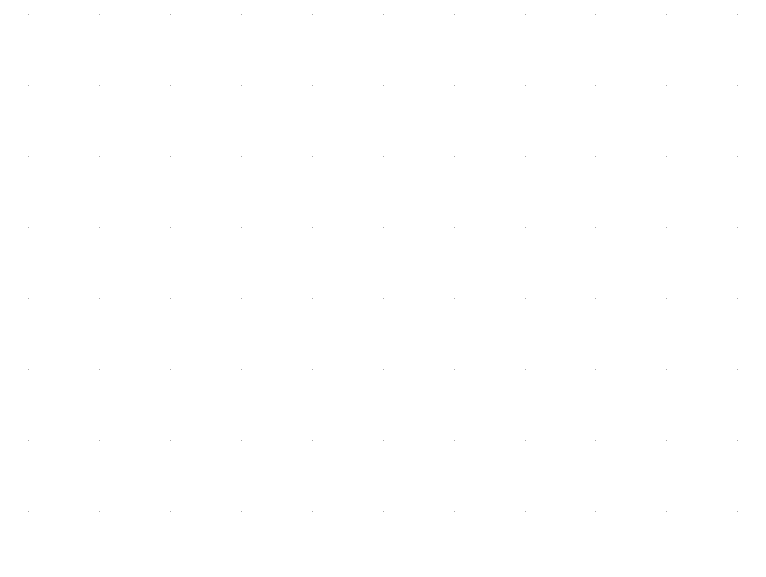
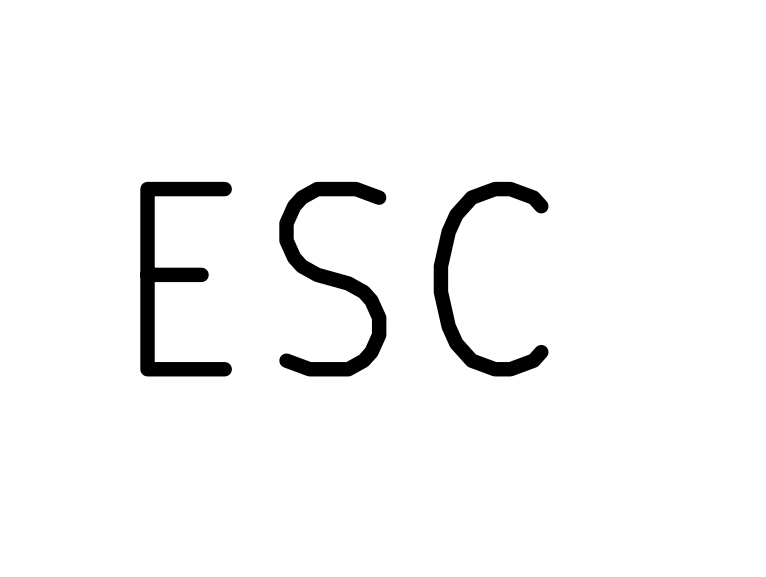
text: none -> ESC (344, 279)

